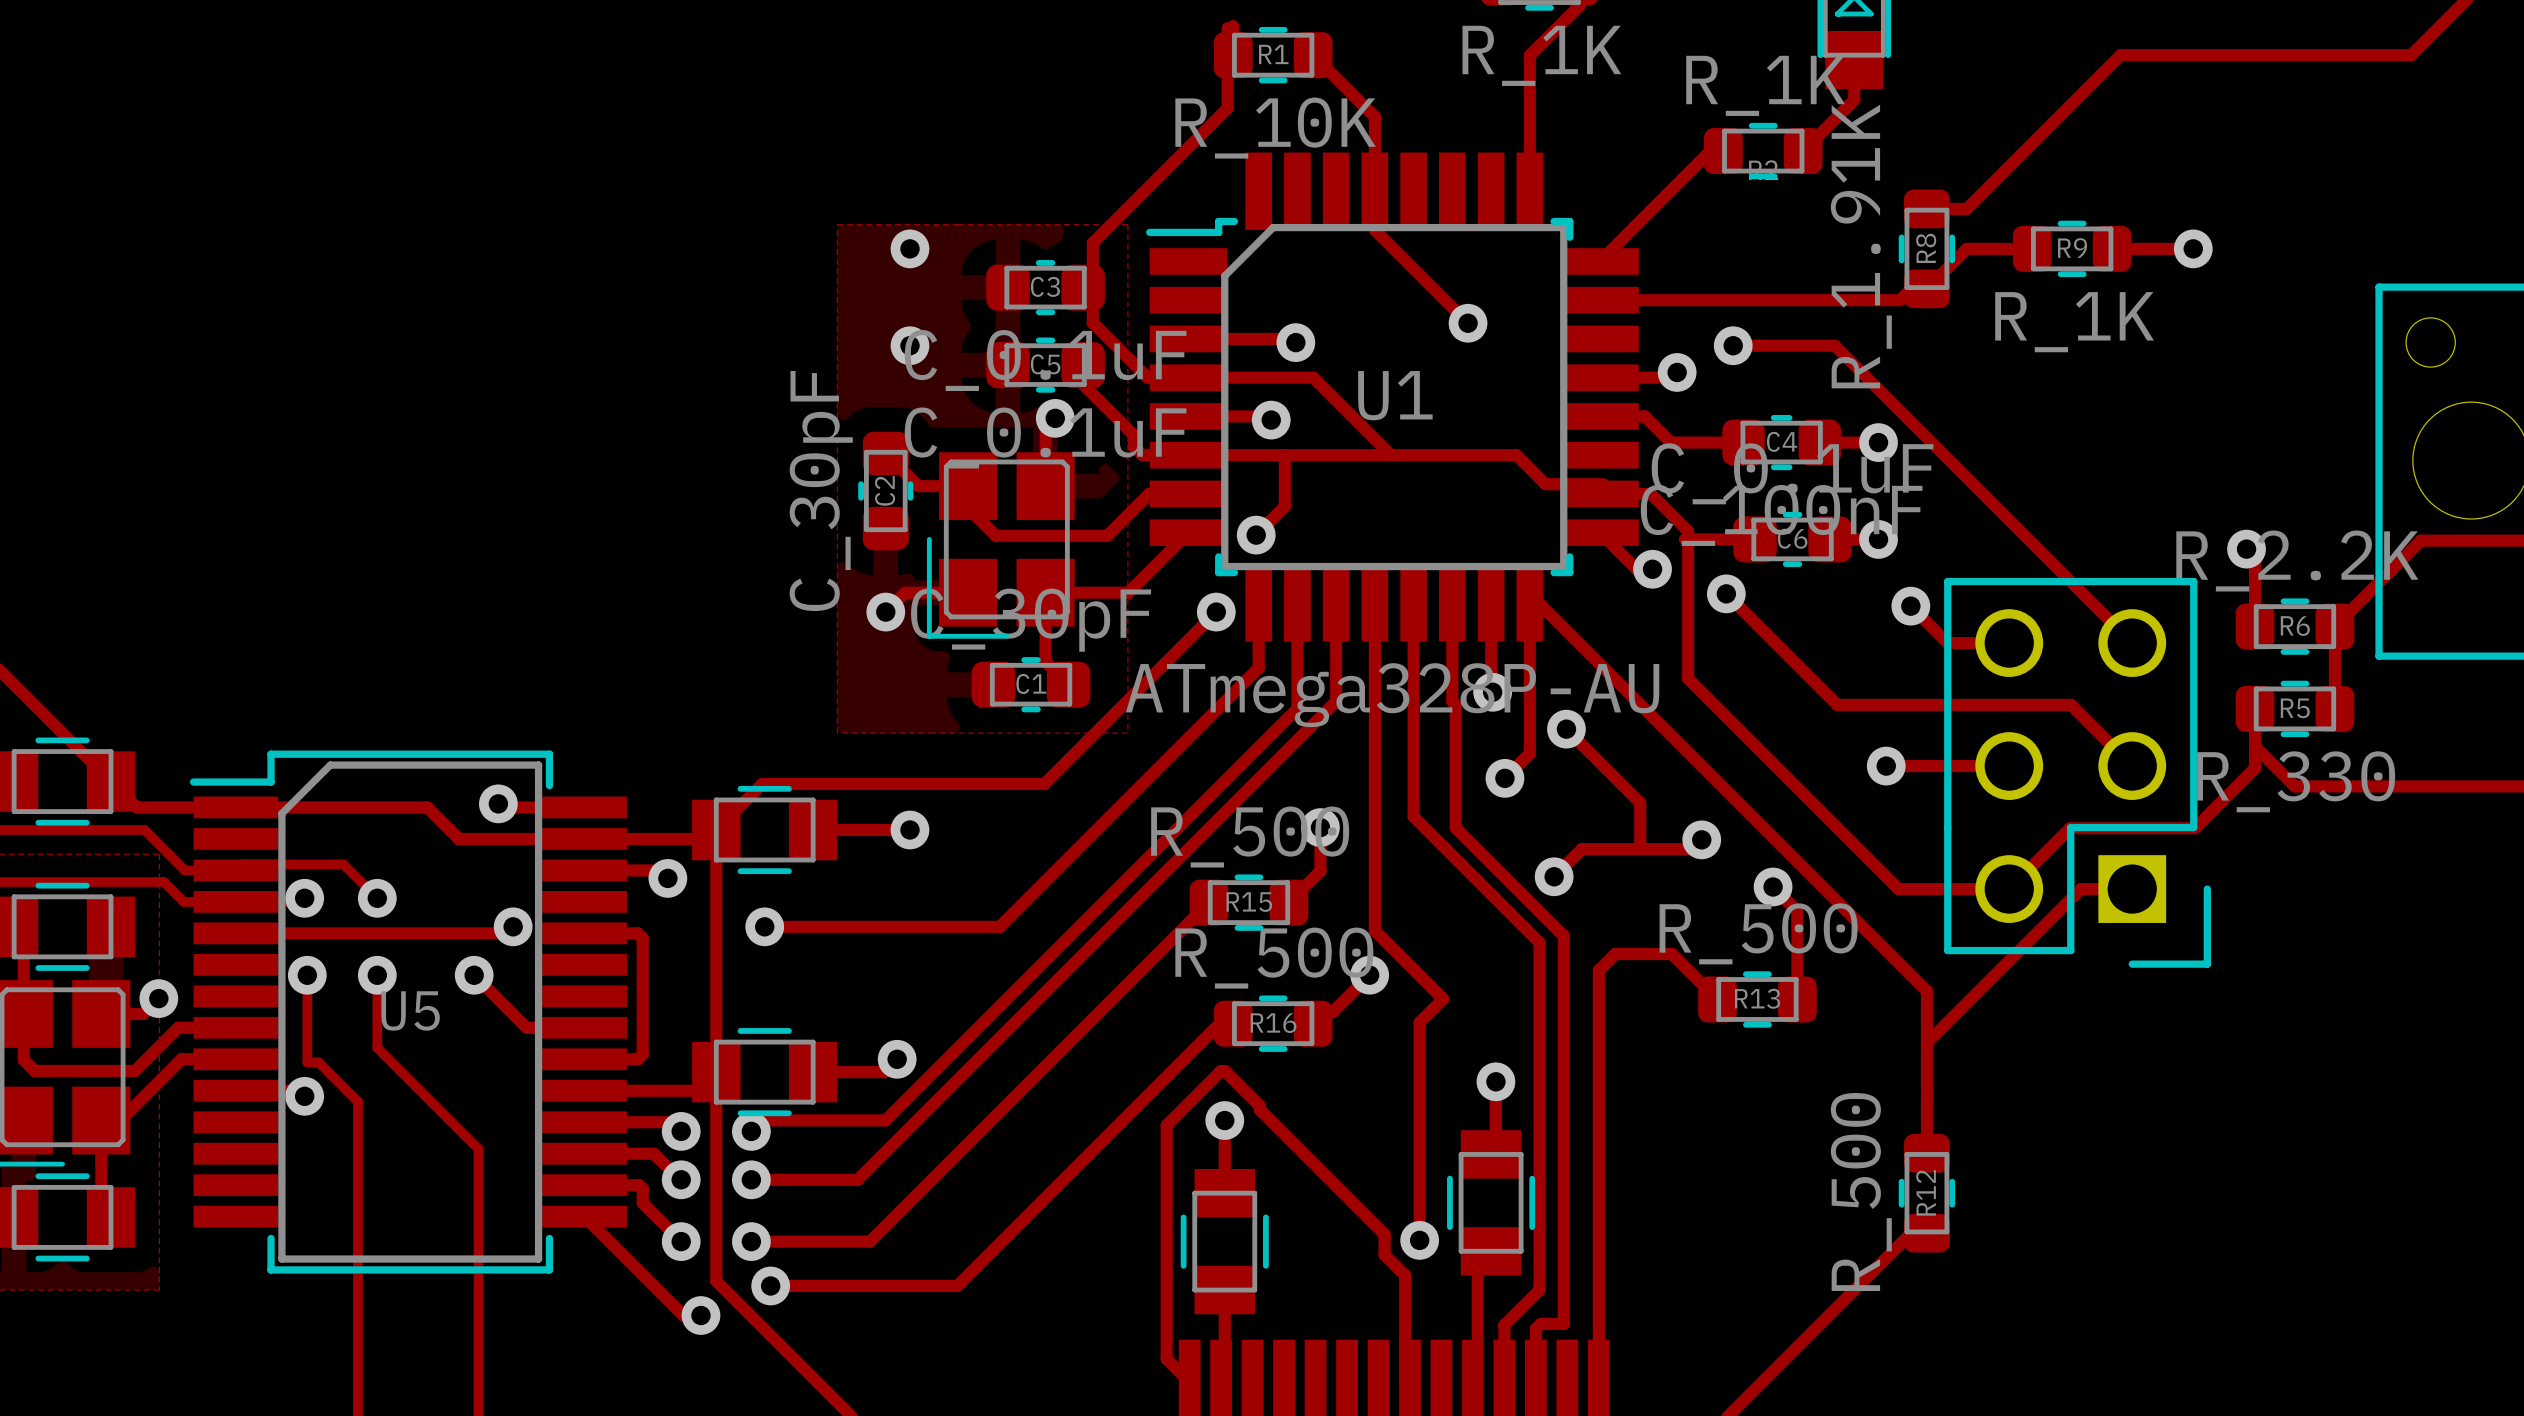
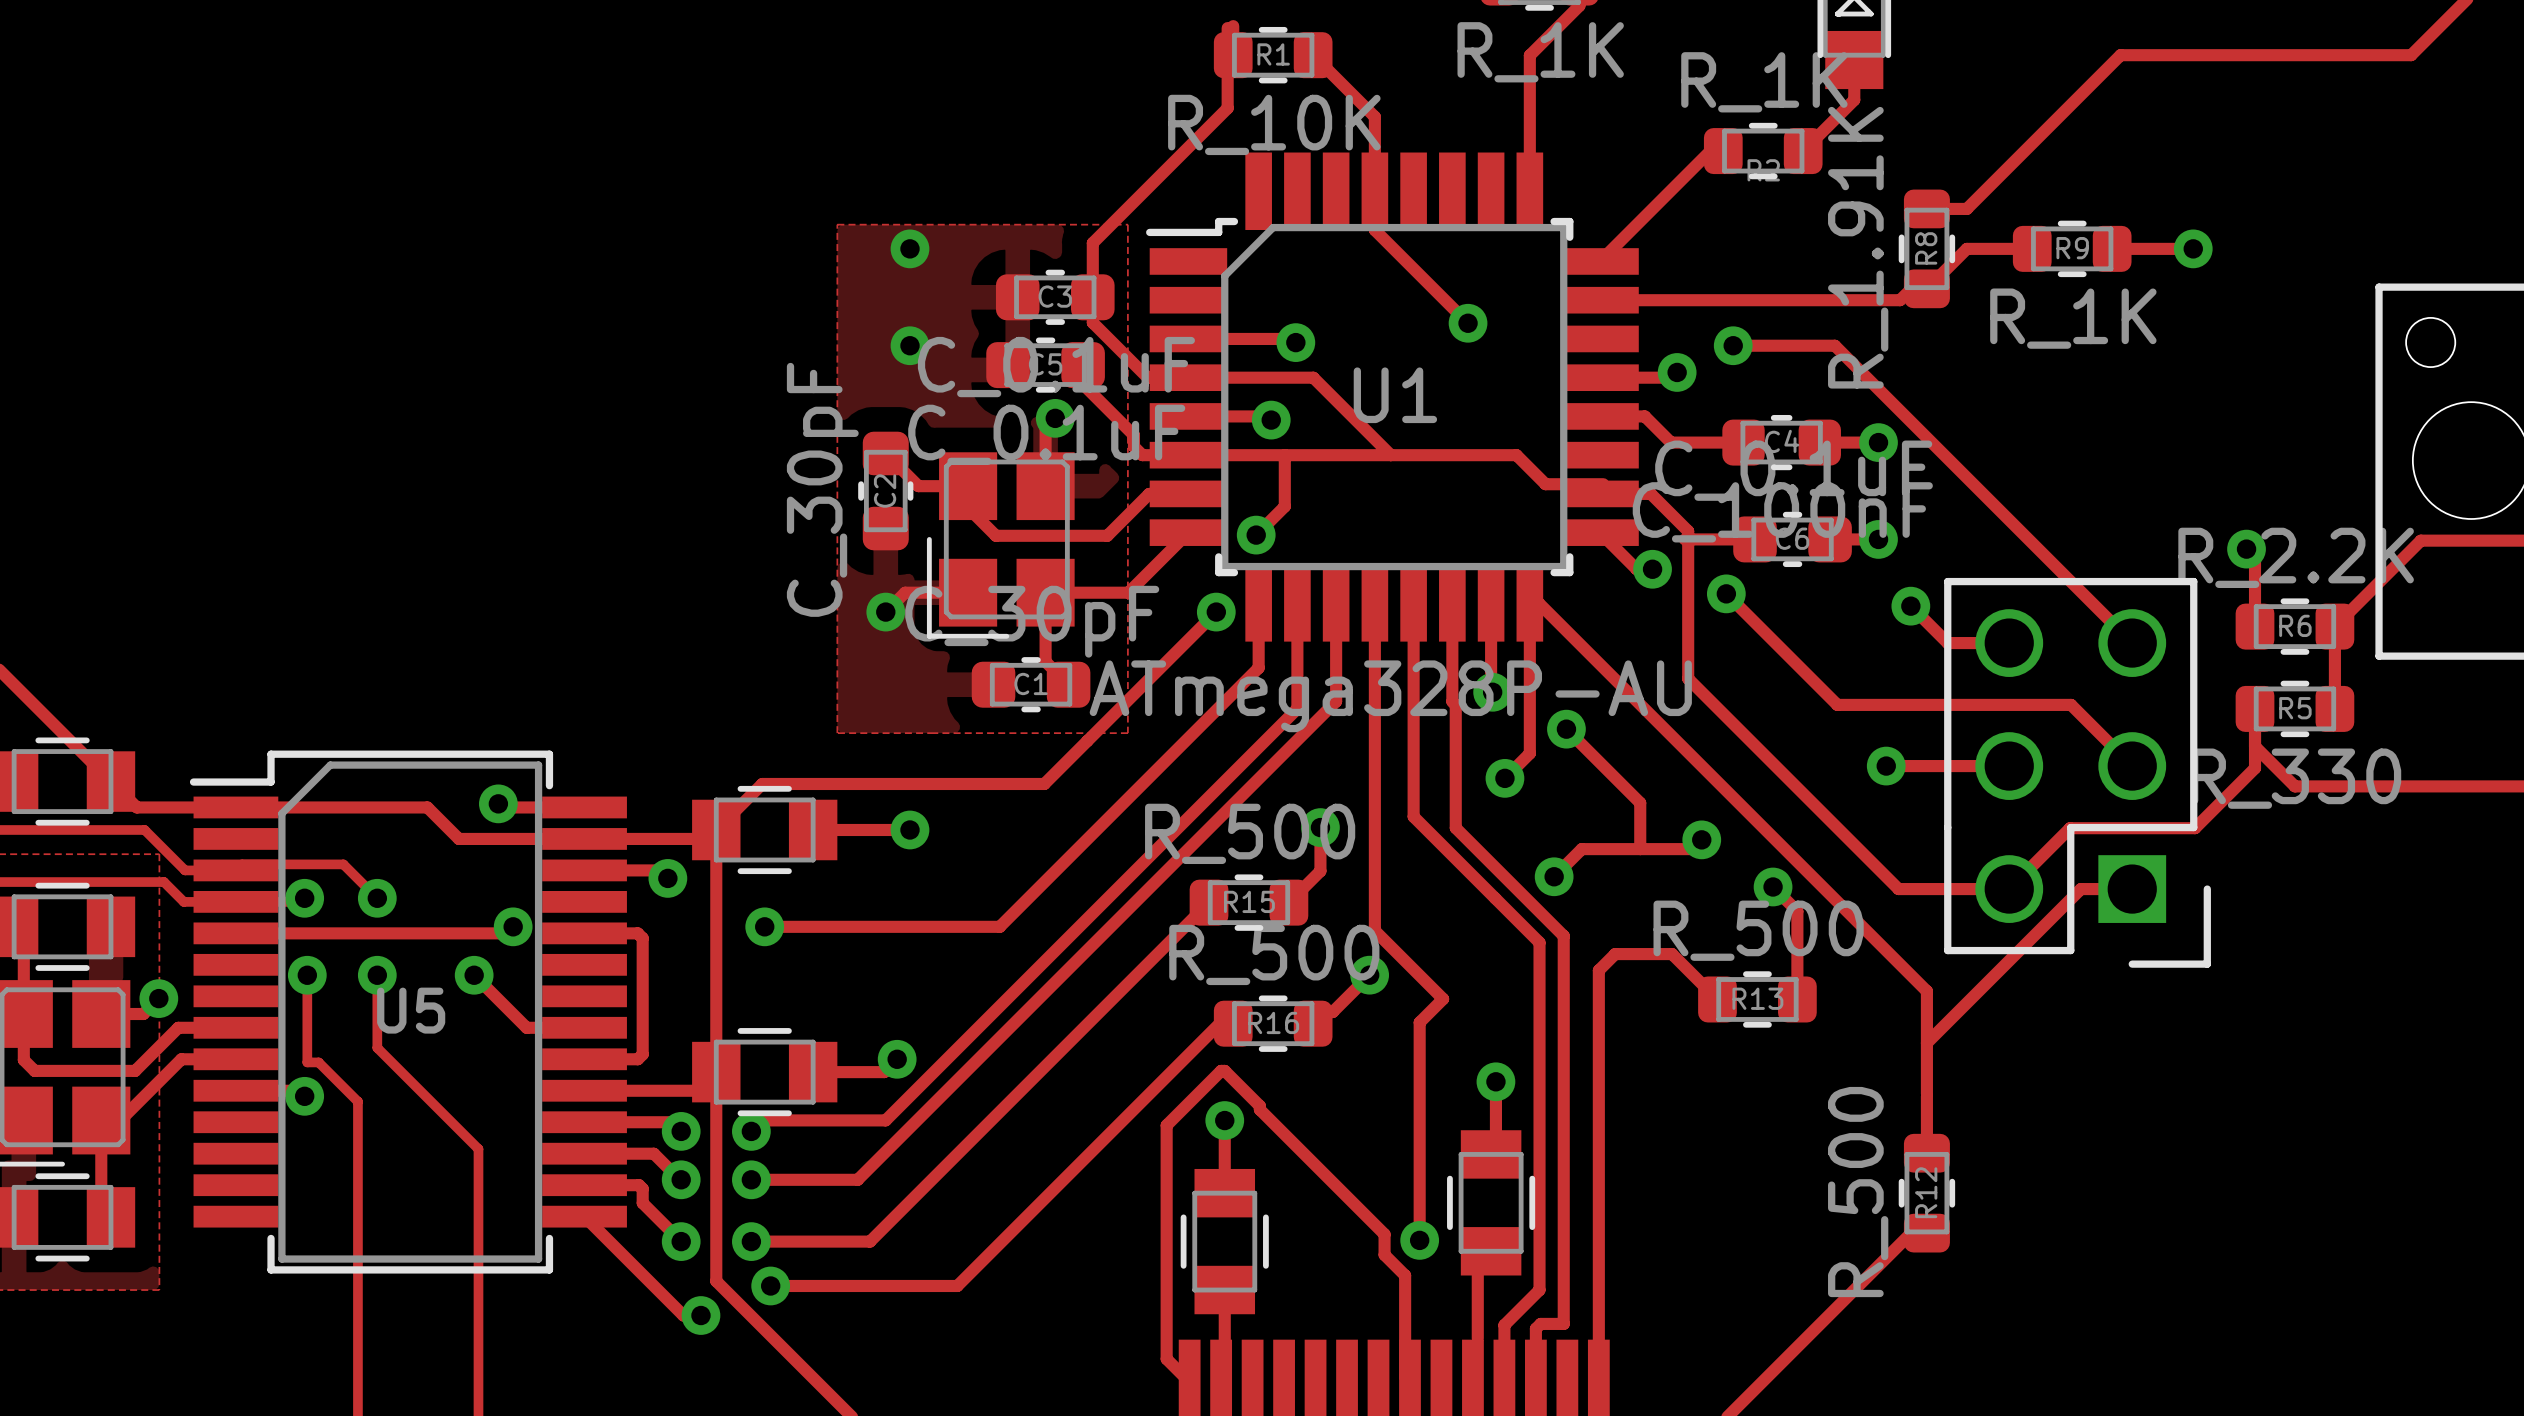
C3 position: (1045, 287) -> (1055, 297)

